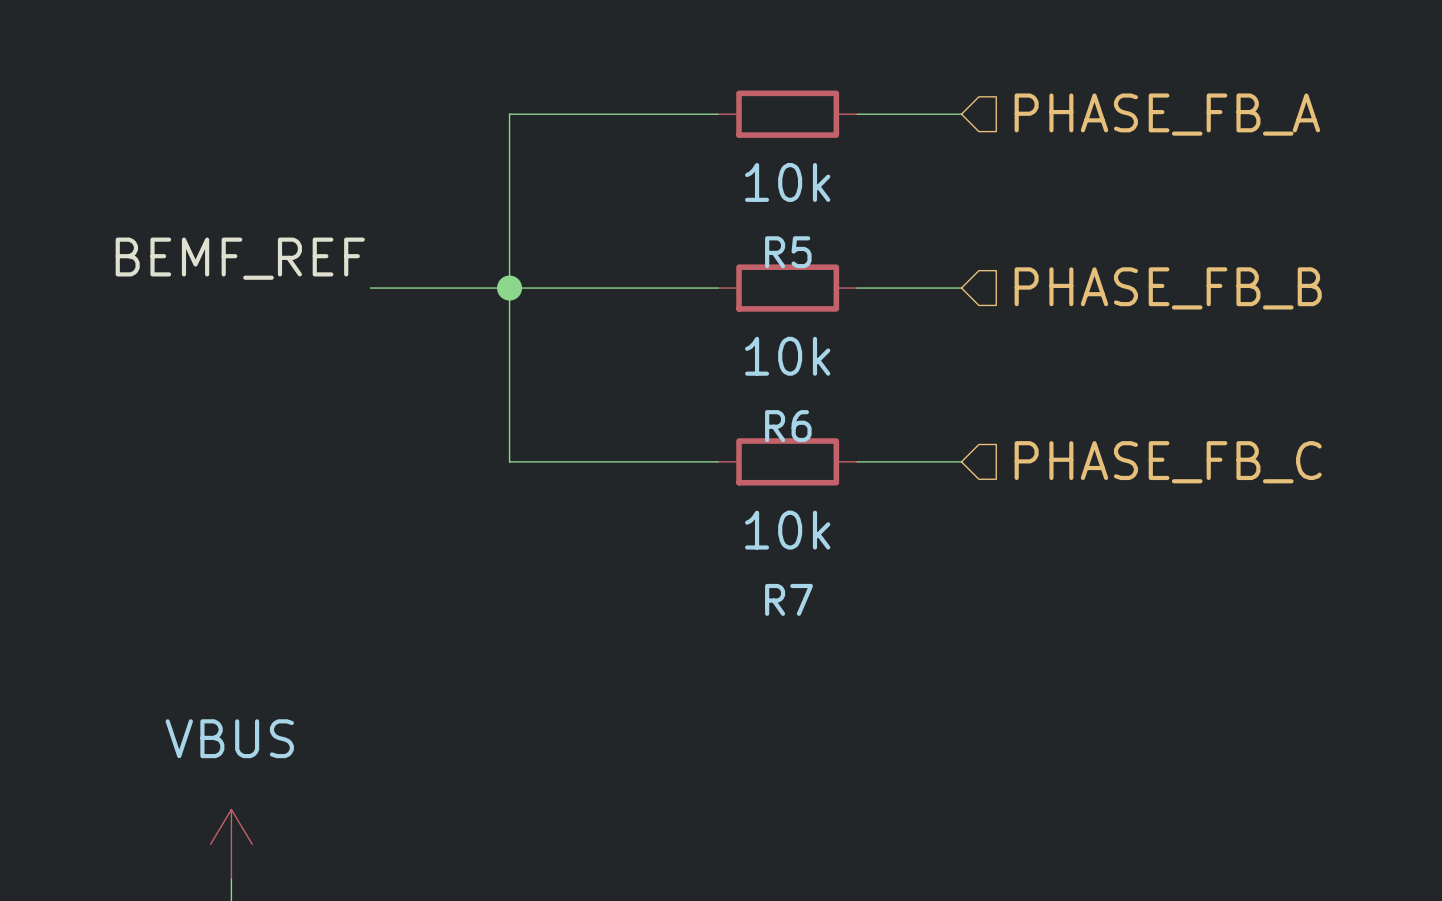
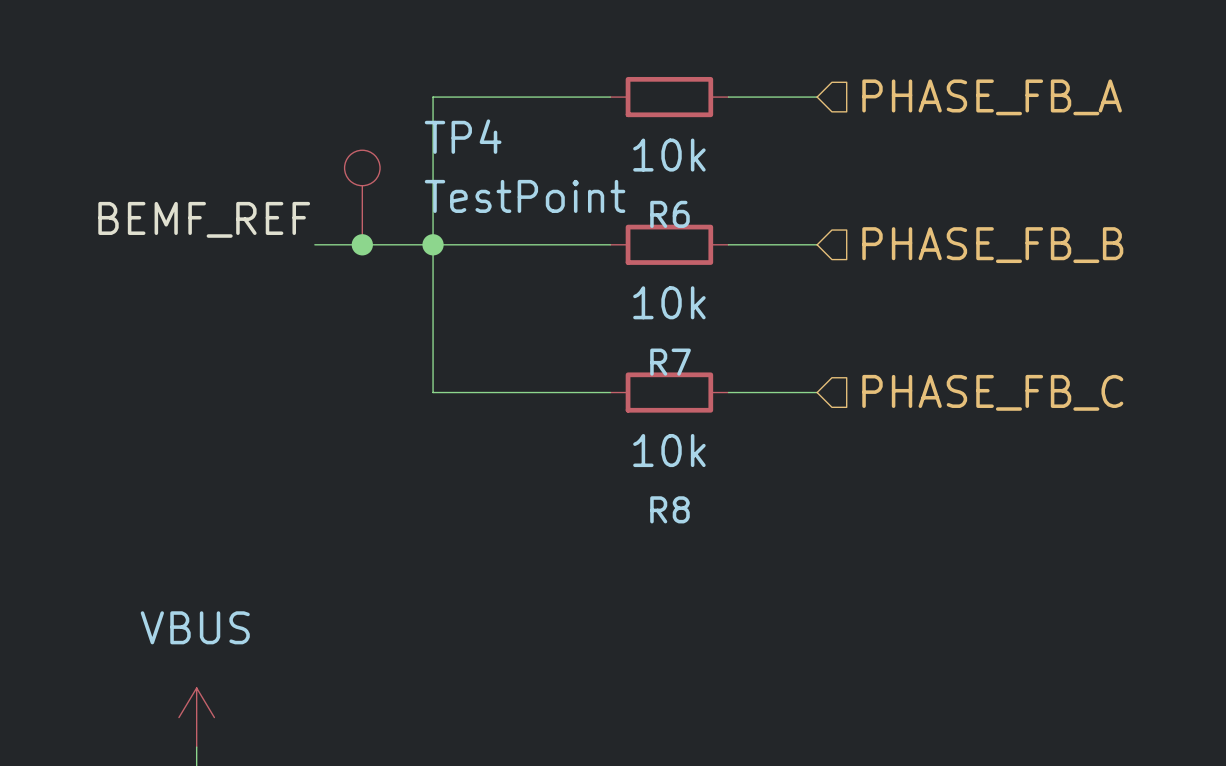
TP4: none -> TestPoint (362, 197)
R5 name: R5 (788, 252) -> R6 (669, 214)
junction: none -> (362, 244)
R6 name: R6 (788, 426) -> R7 (670, 362)
R7 name: R7 (789, 599) -> R8 (669, 509)

